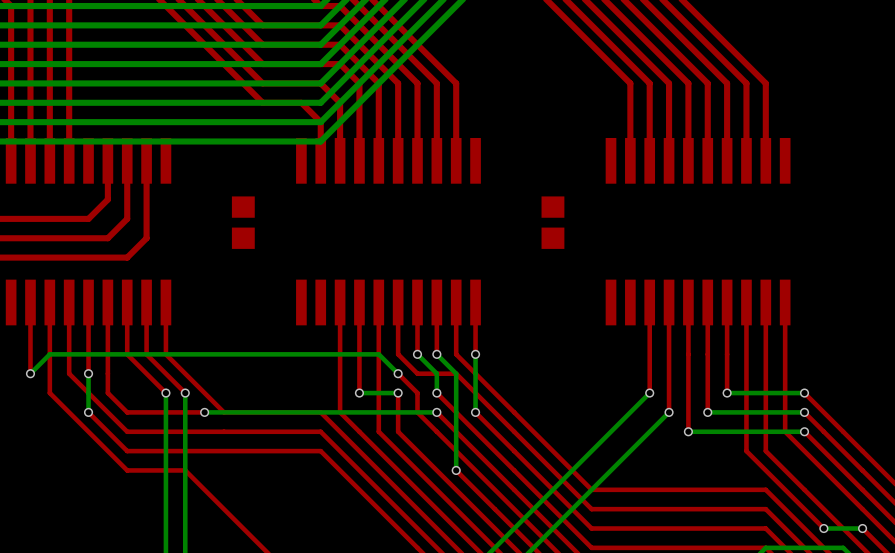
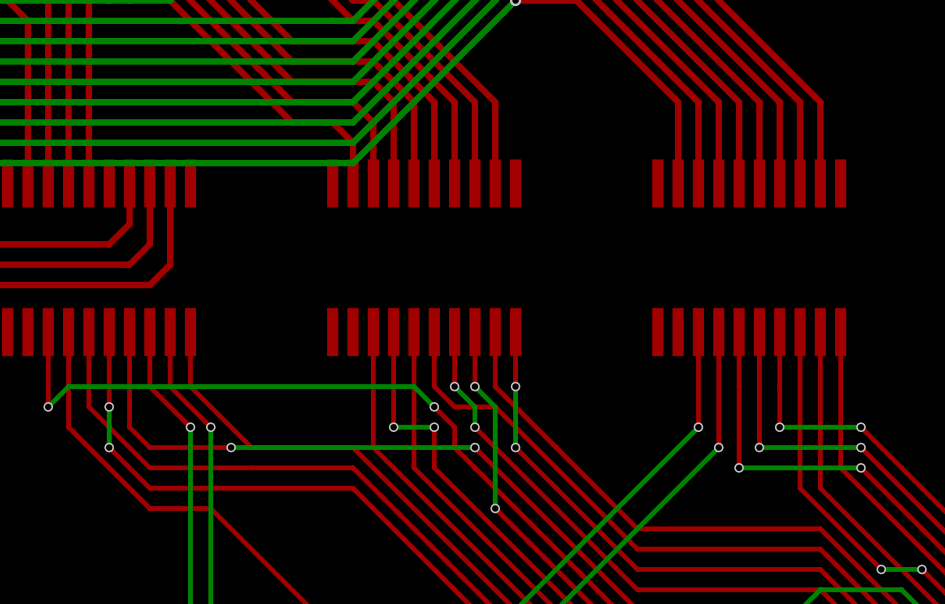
part: (243, 222) -> none
part: (552, 222) -> none

